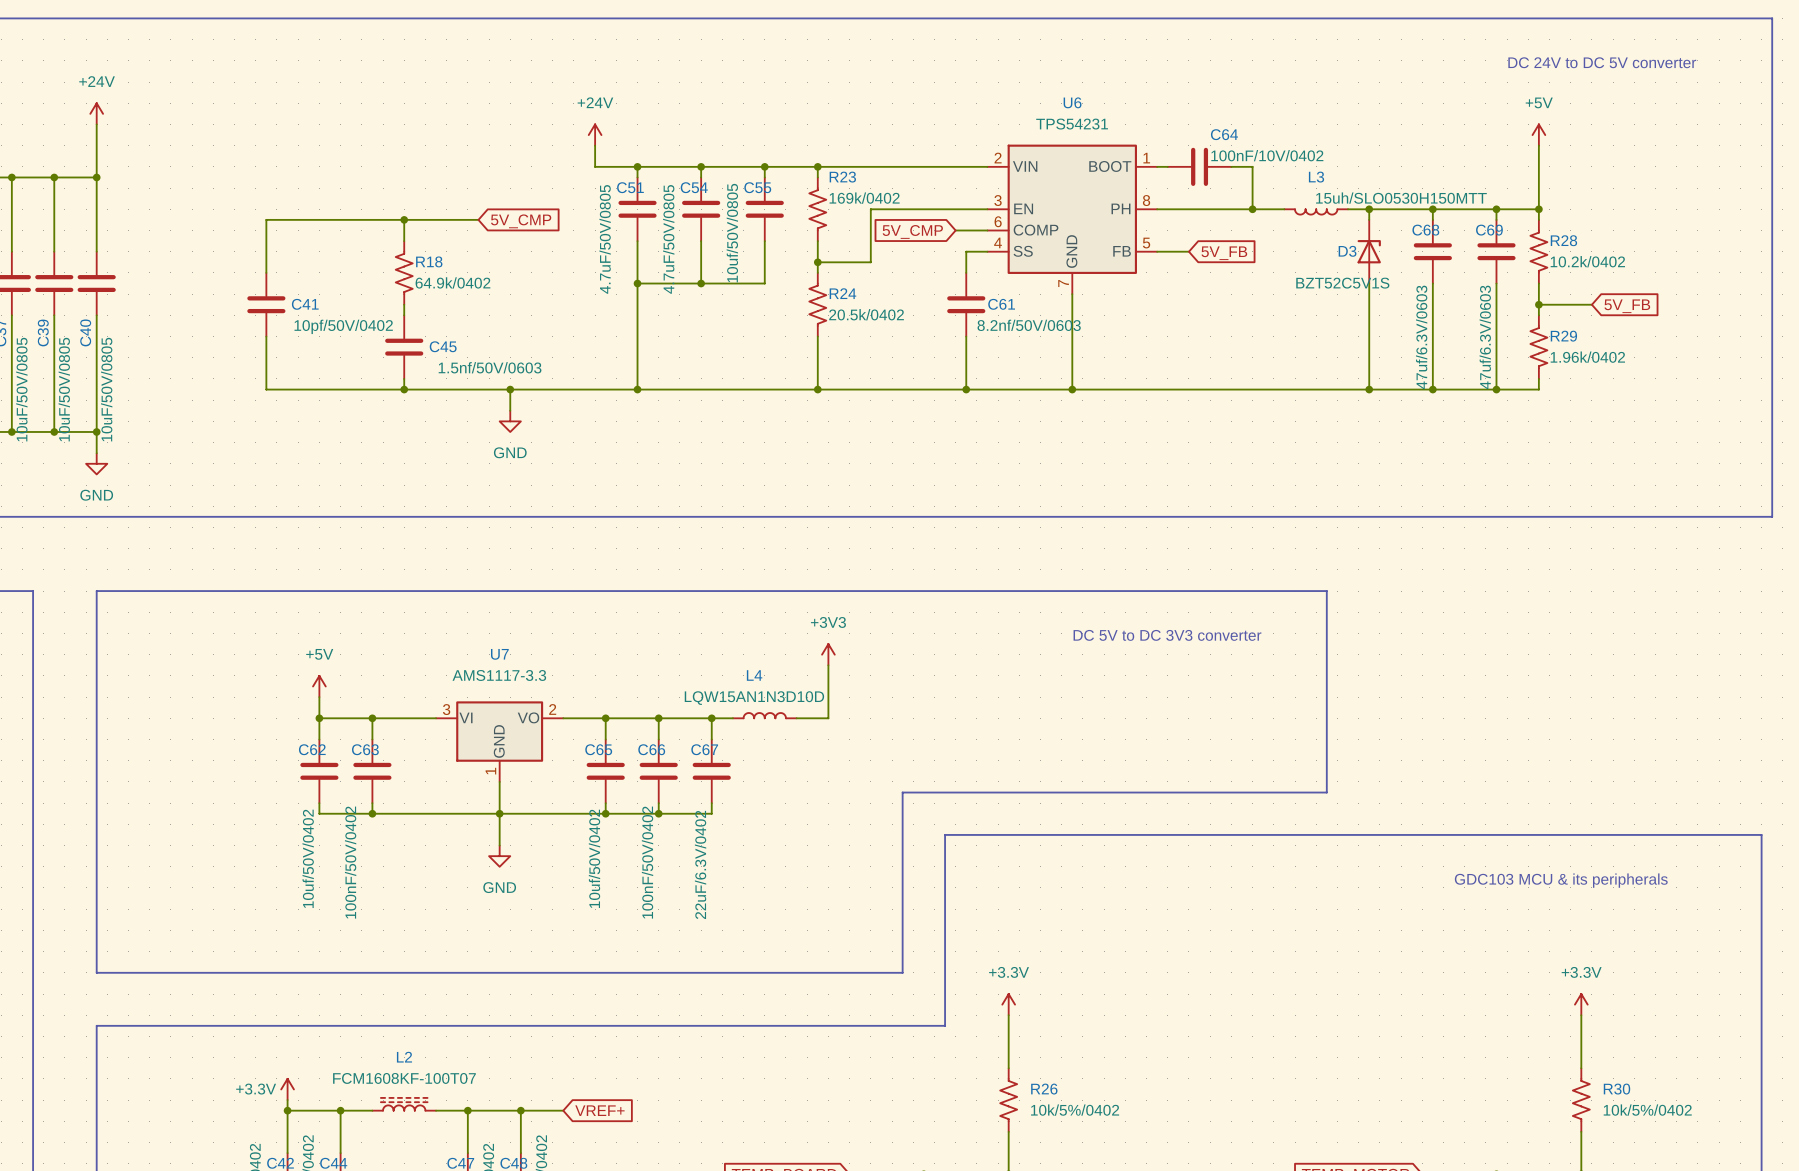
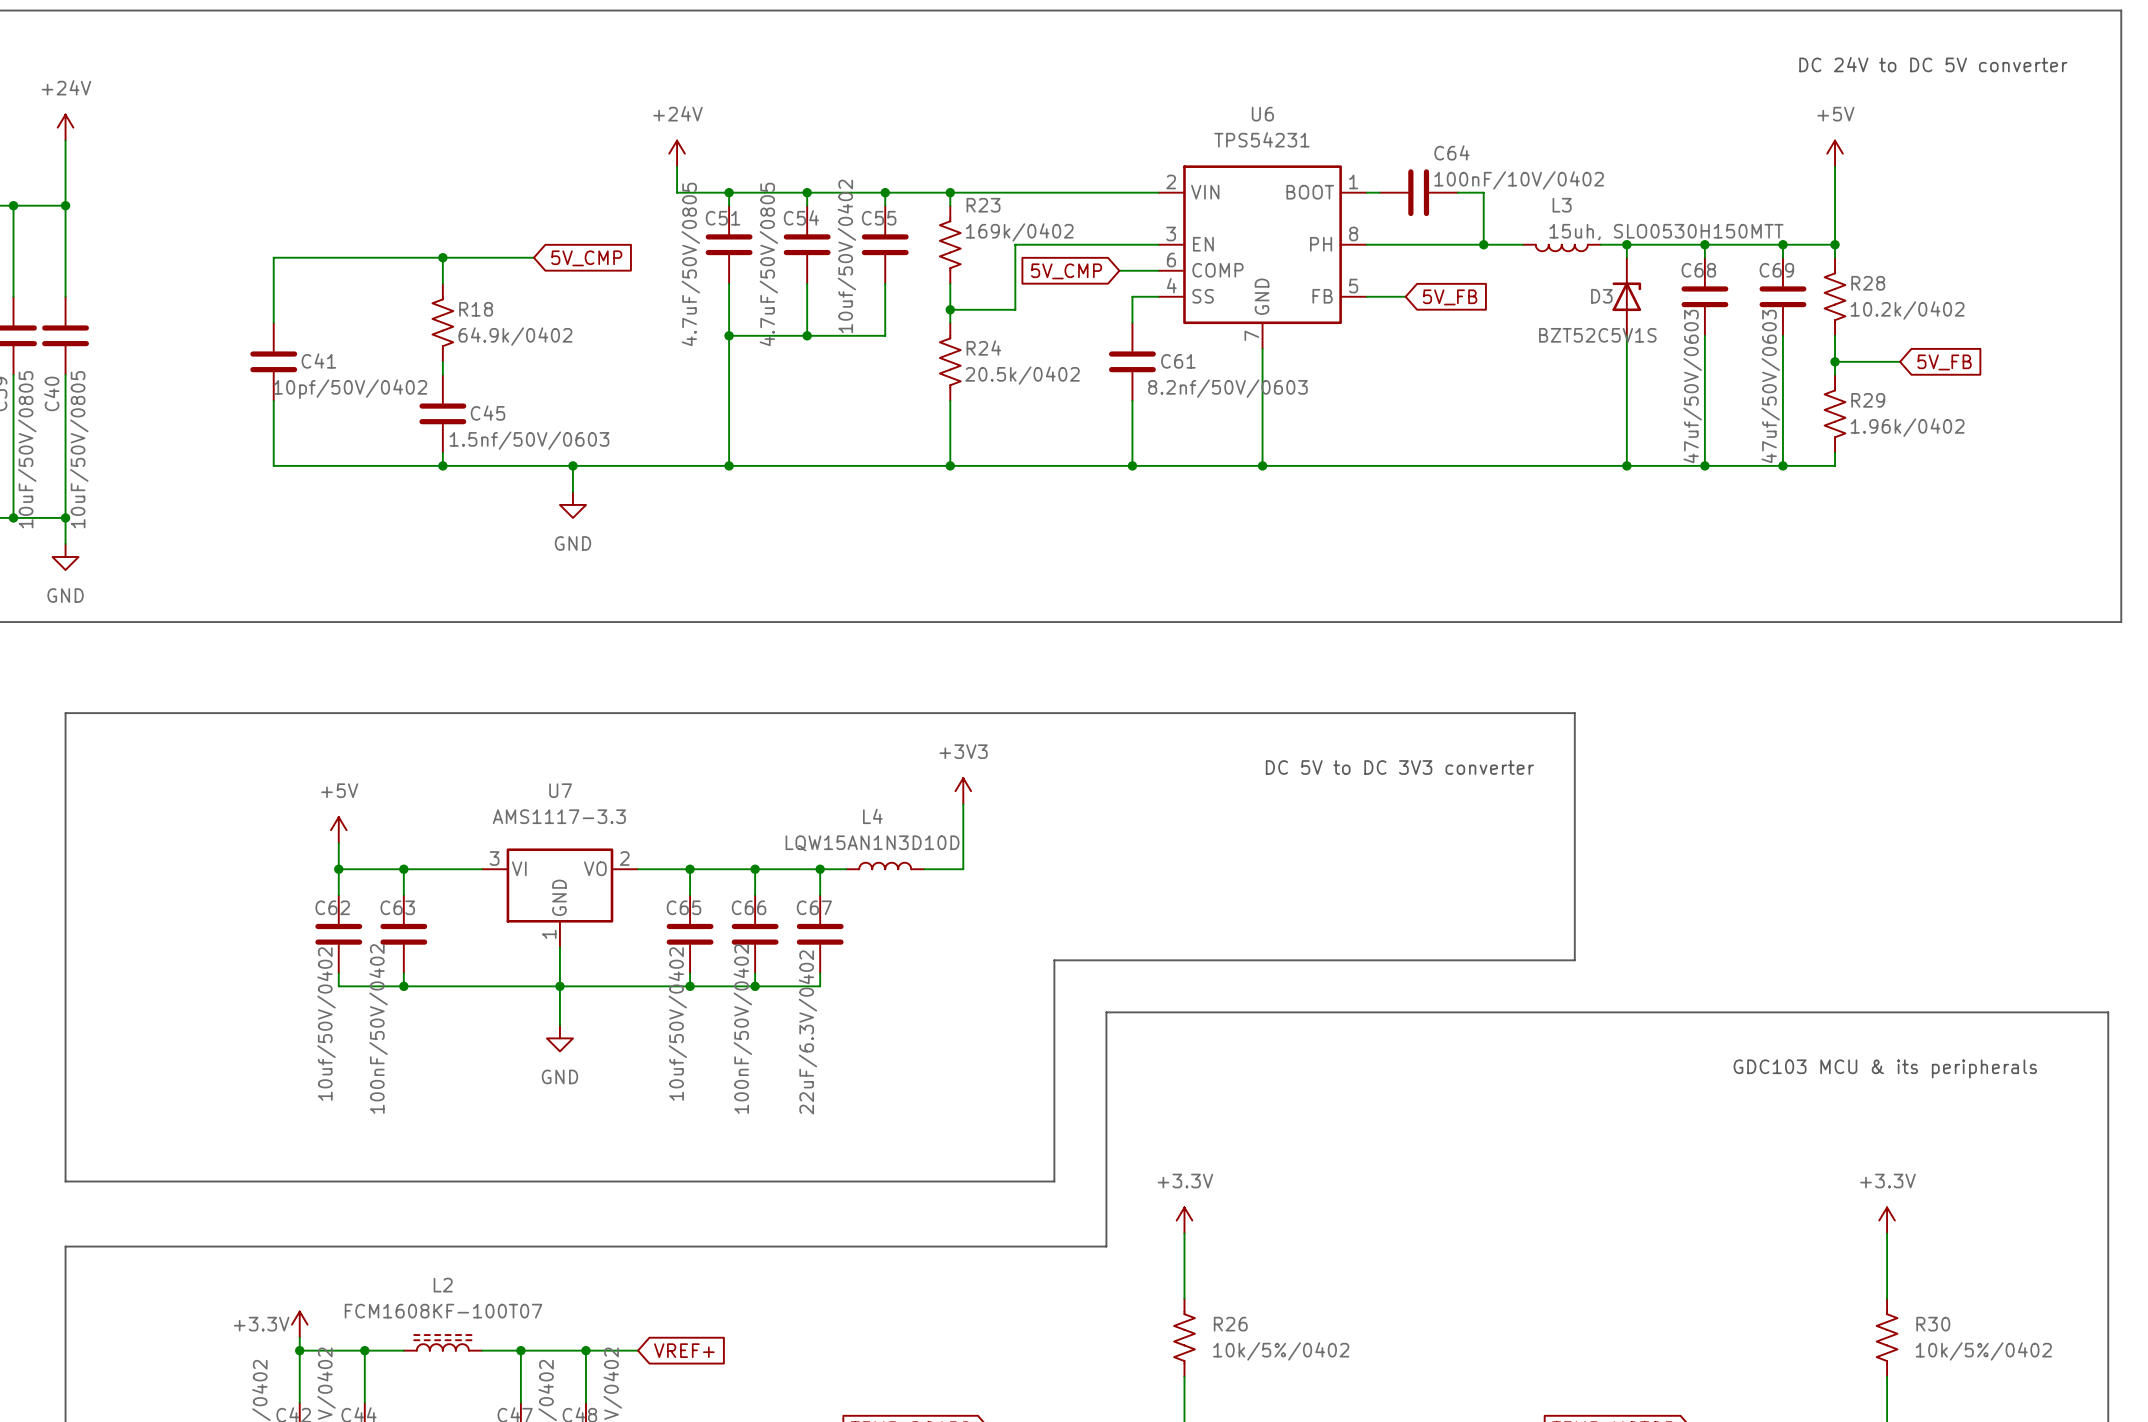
L3 value: 15uh/SLO0530H150MTT (1401, 198) -> 15uh, SLO0530H150MTT (1666, 232)
C55 value: 10uf/50V/0805 (732, 233) -> 10uf/50V/0402 (846, 256)
C68 value: 47uf/6.3V/0603 (1421, 337) -> 47uf/50V/0603 (1692, 386)
C69 value: 47uf/6.3V/0603 (1485, 337) -> 47uf/50V/0603 (1770, 386)

